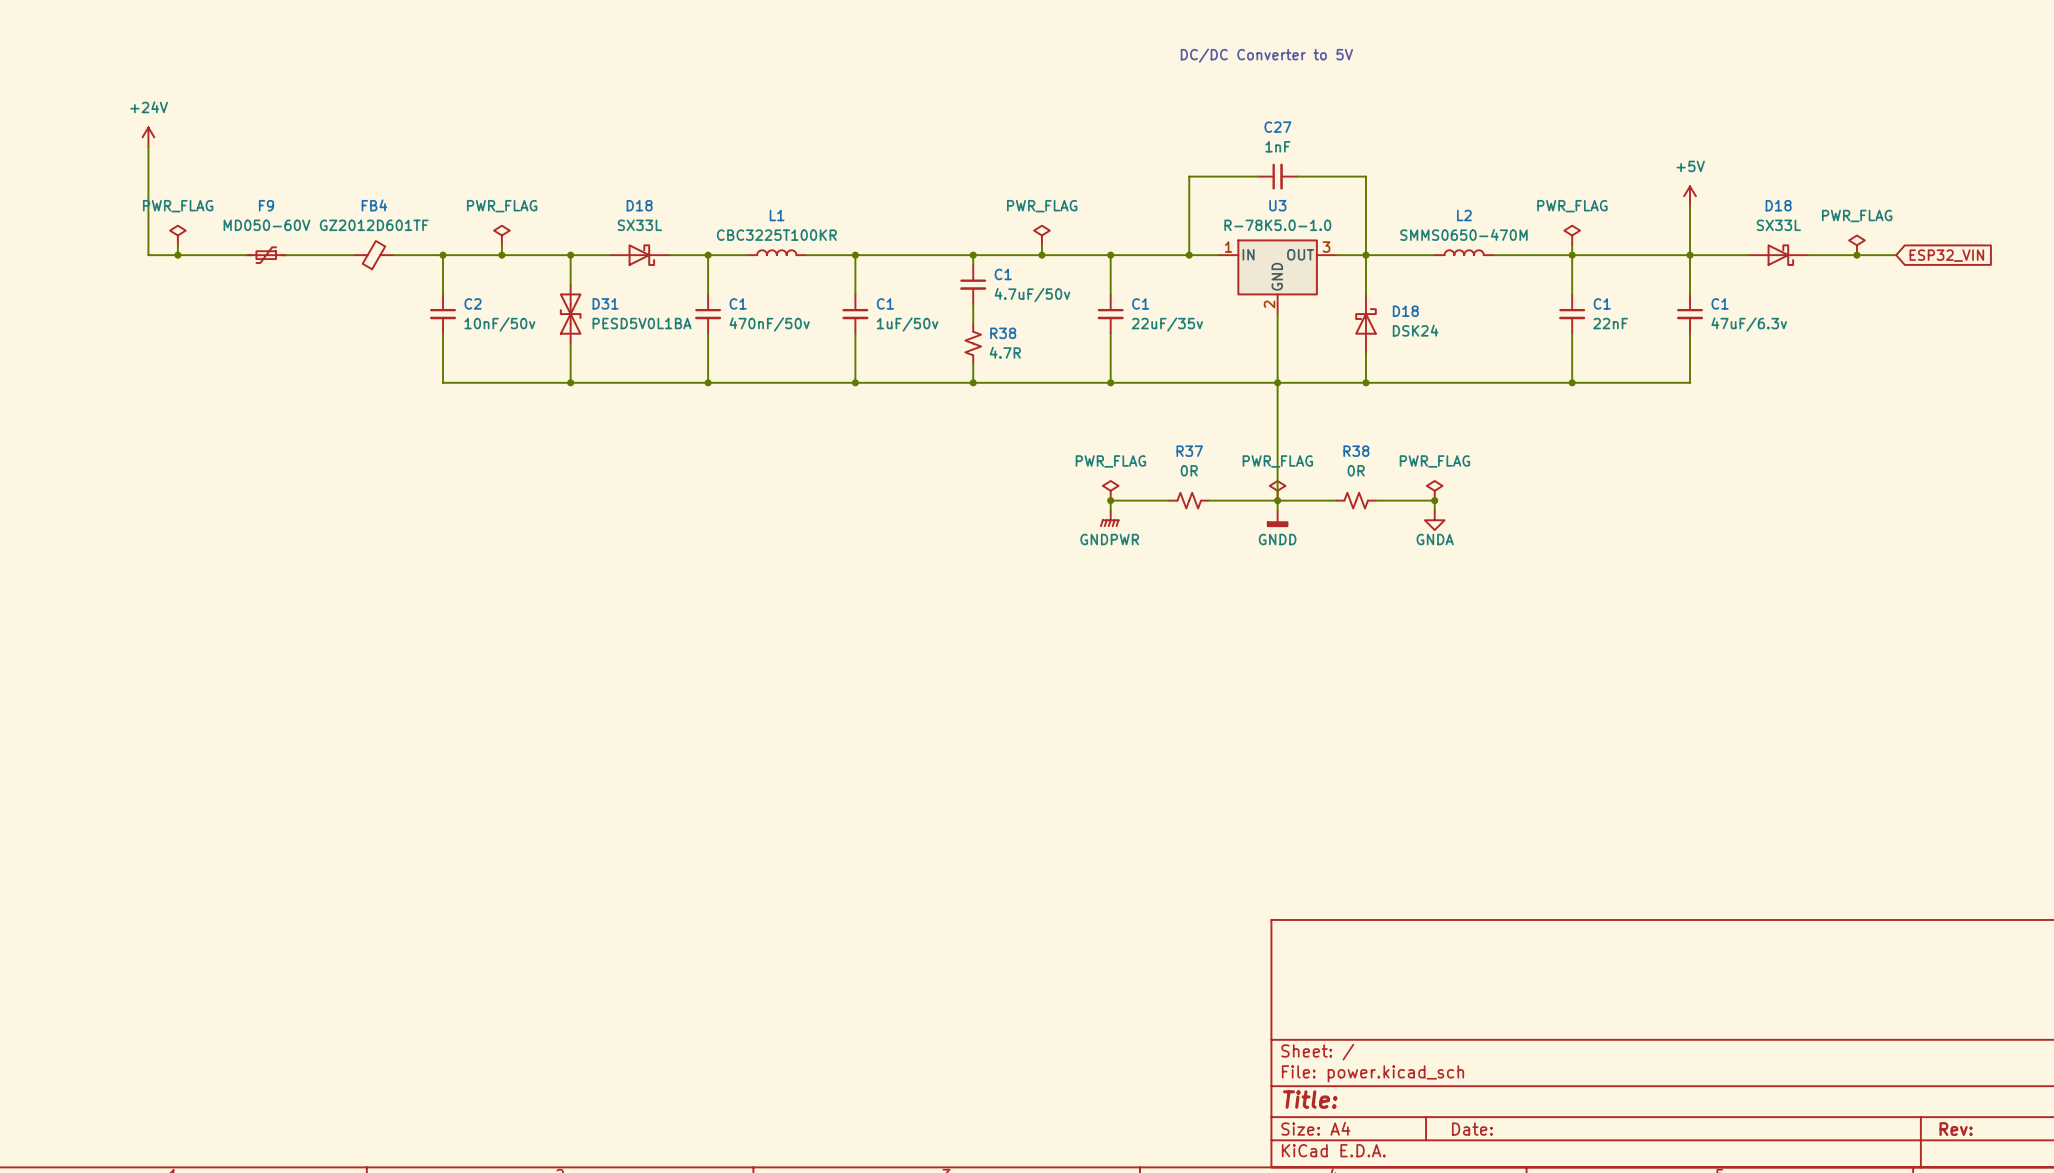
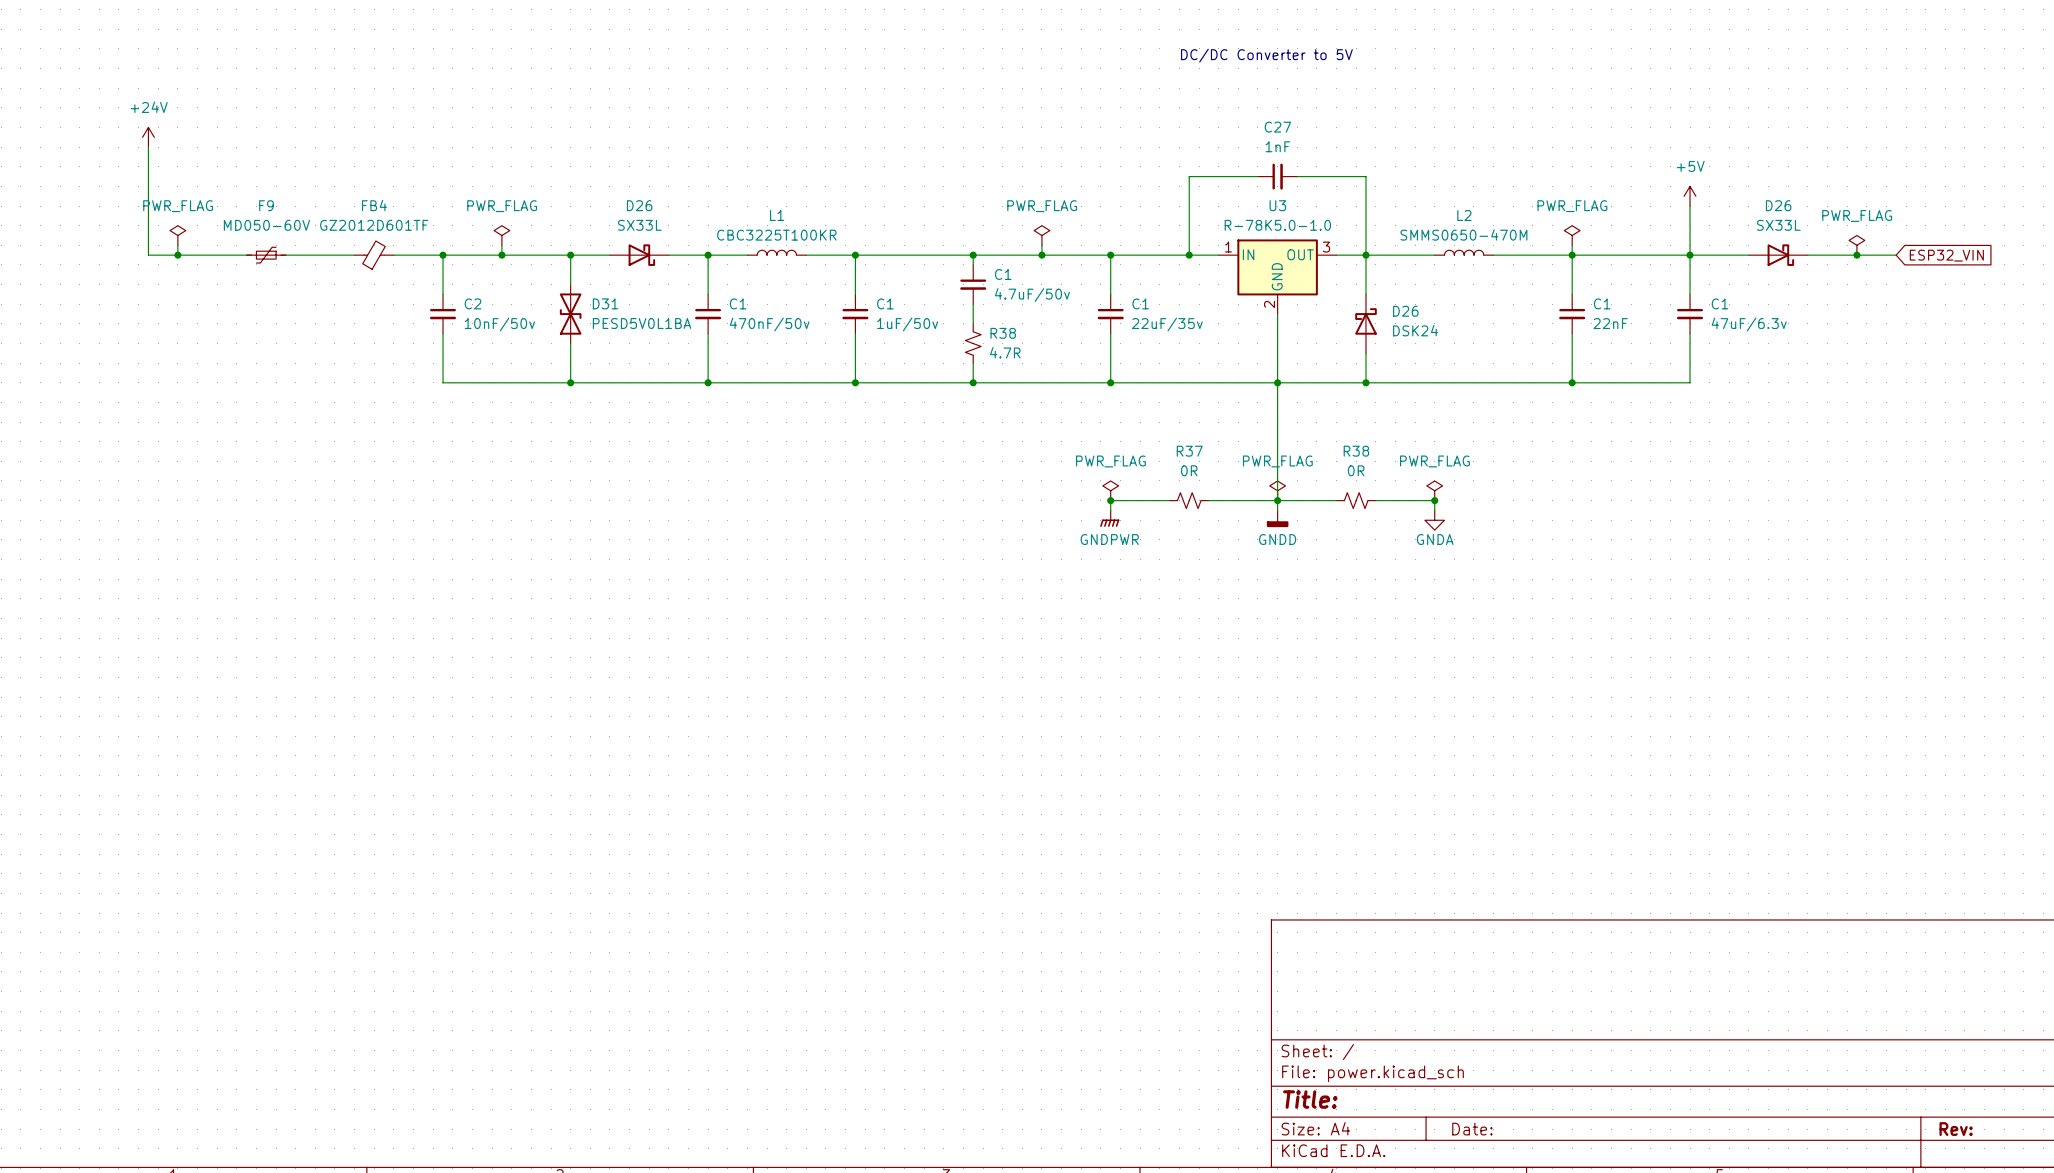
D18 name: D18 (639, 205) -> D26 (639, 205)
D18 name: D18 (1778, 205) -> D26 (1778, 205)
D18 name: D18 (1405, 311) -> D26 (1405, 311)

